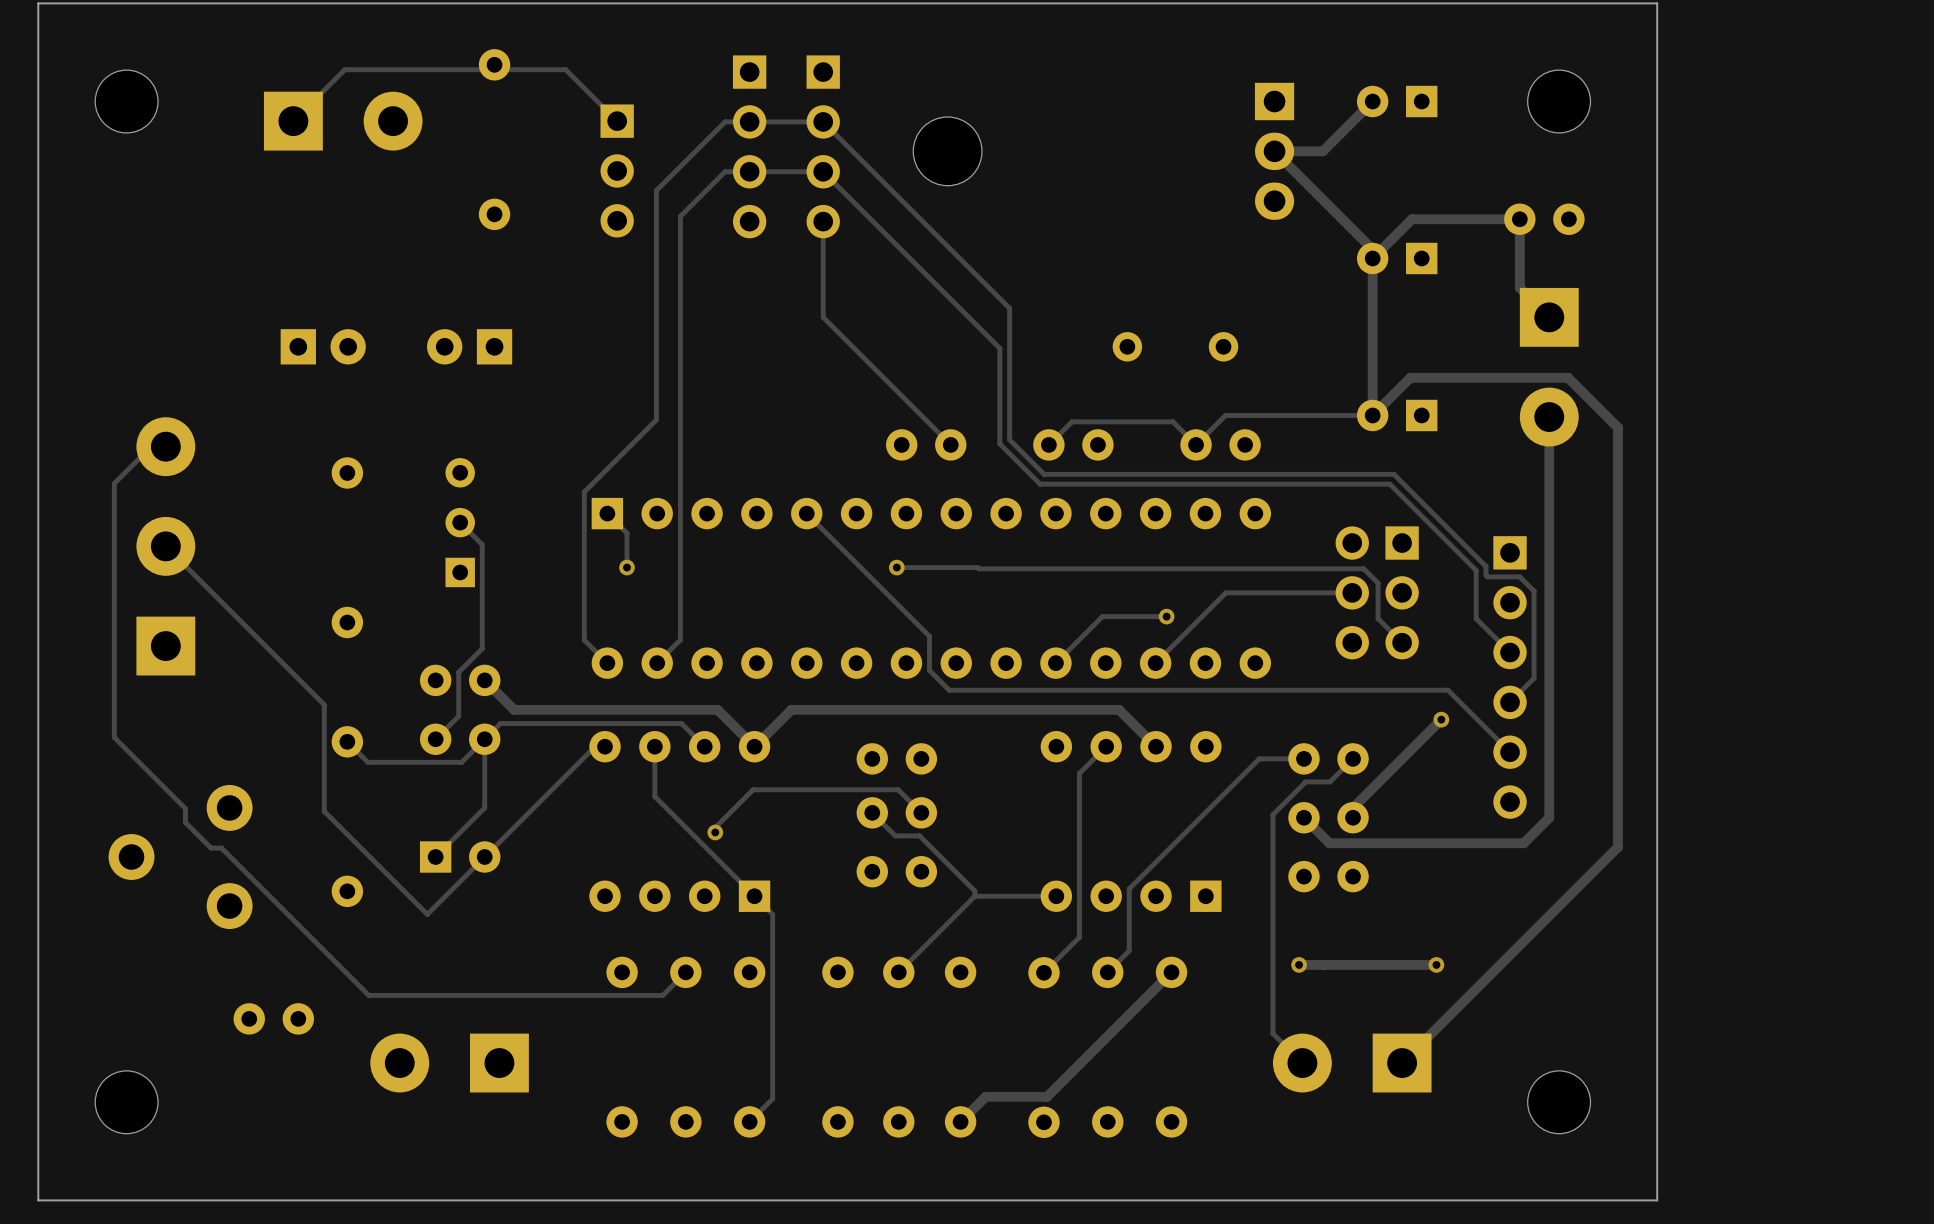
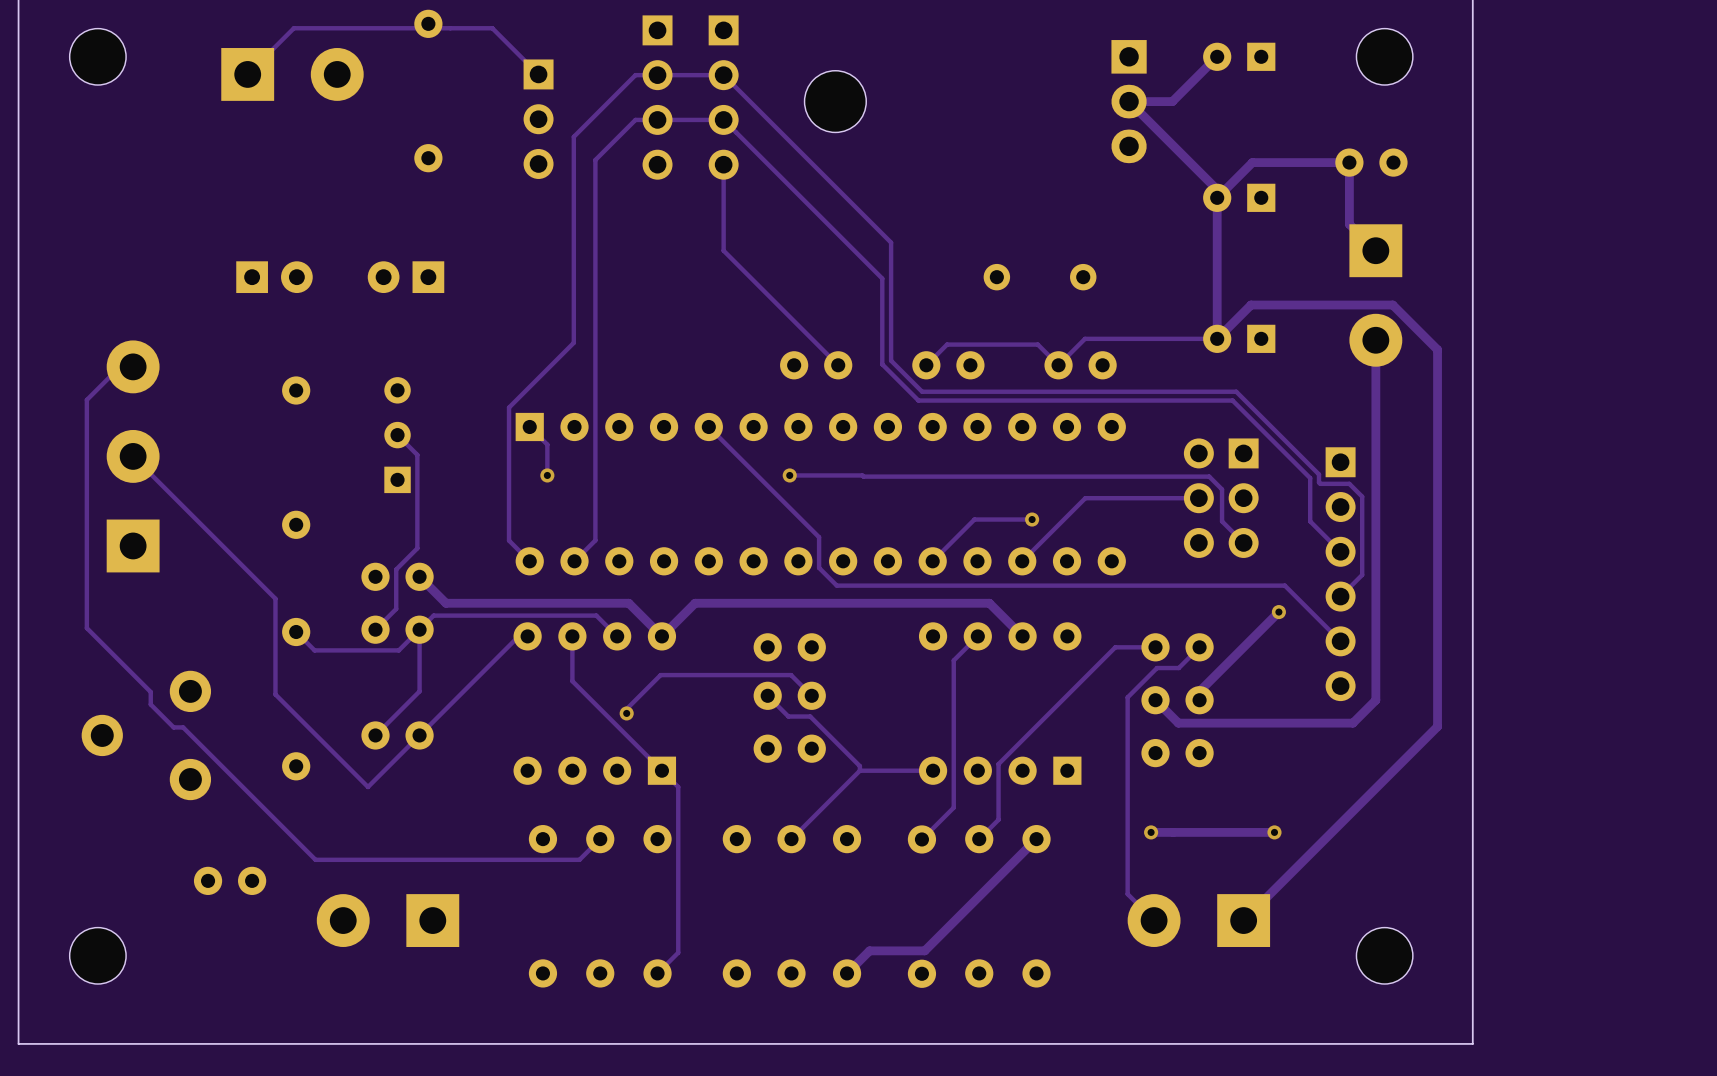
part footprint: [419, 841, 501, 873] -> [361, 721, 434, 750]

